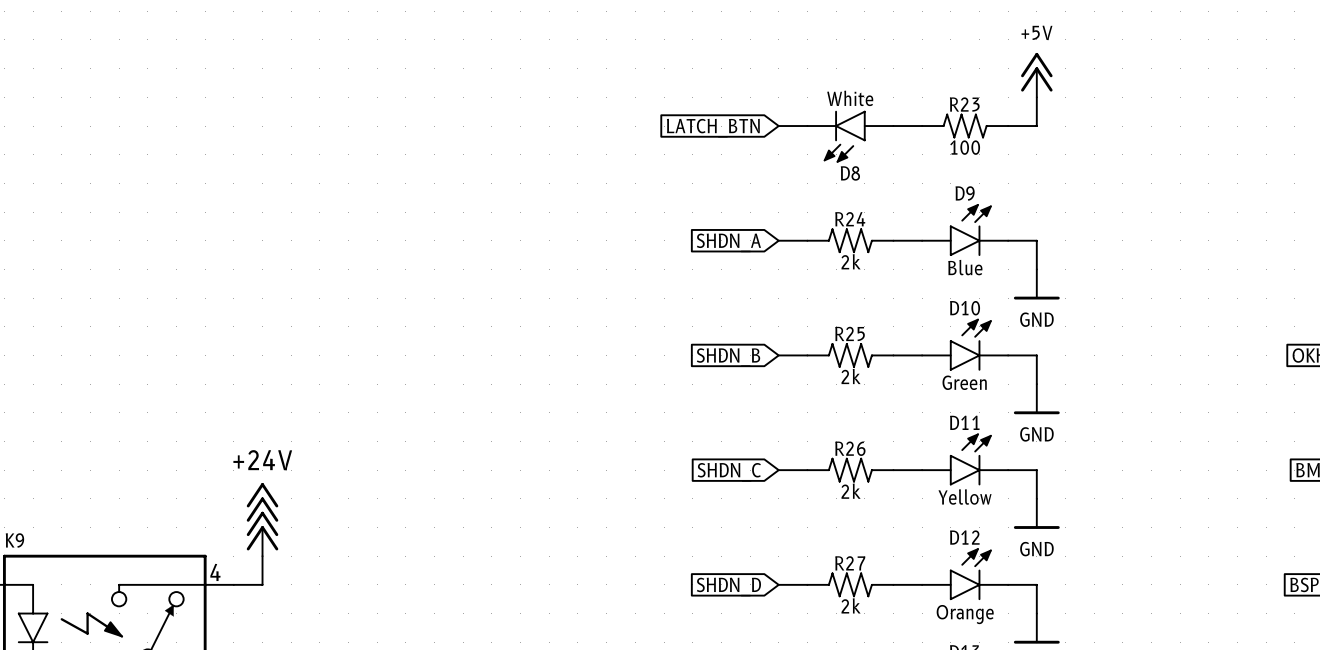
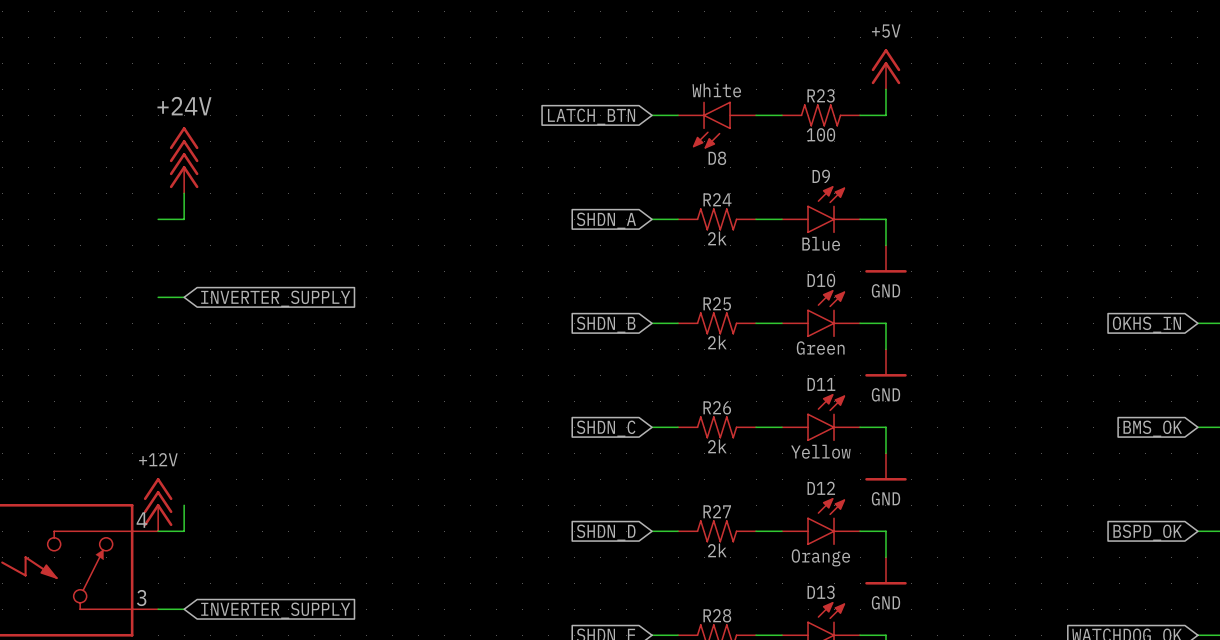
power symbol: none -> +24V (184, 160)
wire: none -> (184, 193) (184, 219) (158, 219)
wire: none -> (158, 297) (184, 297)
global label: none -> INVERTER_SUPPLY (275, 298)
power symbol: +24V (262, 519) -> none
power symbol: none -> +12V (158, 504)

